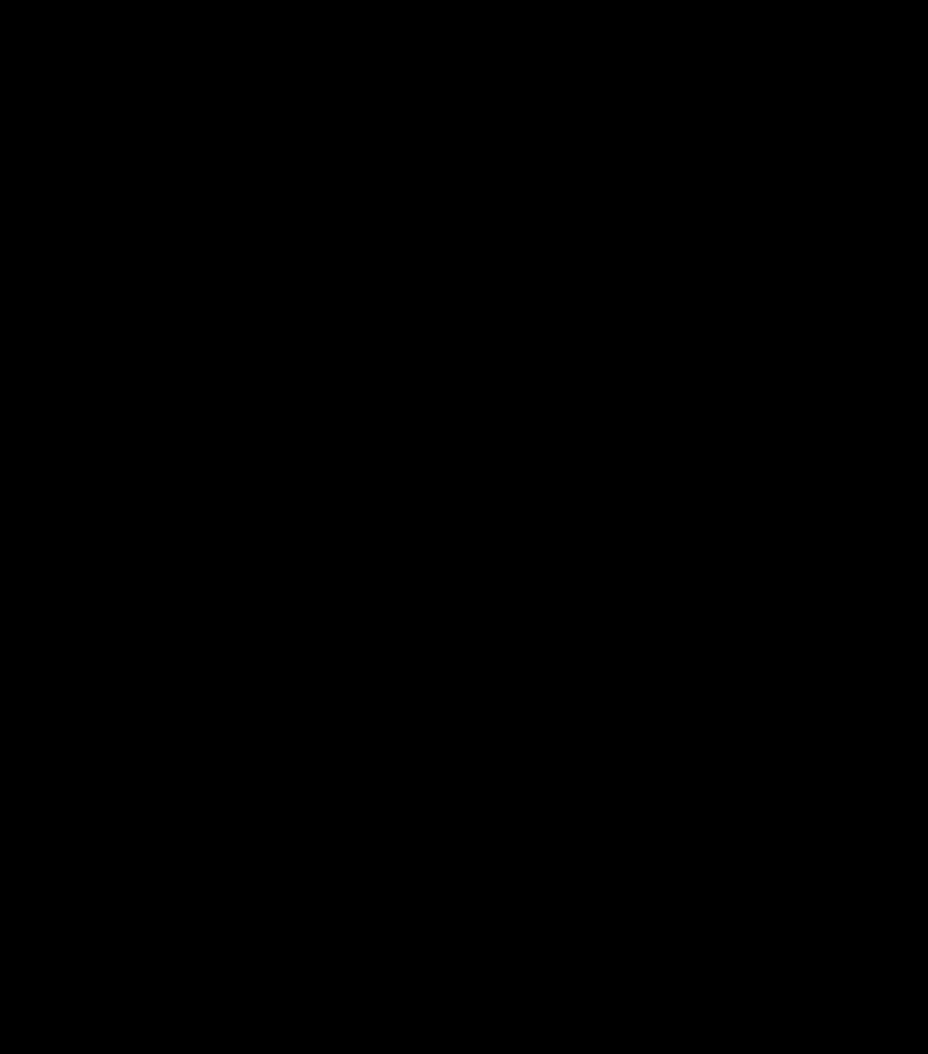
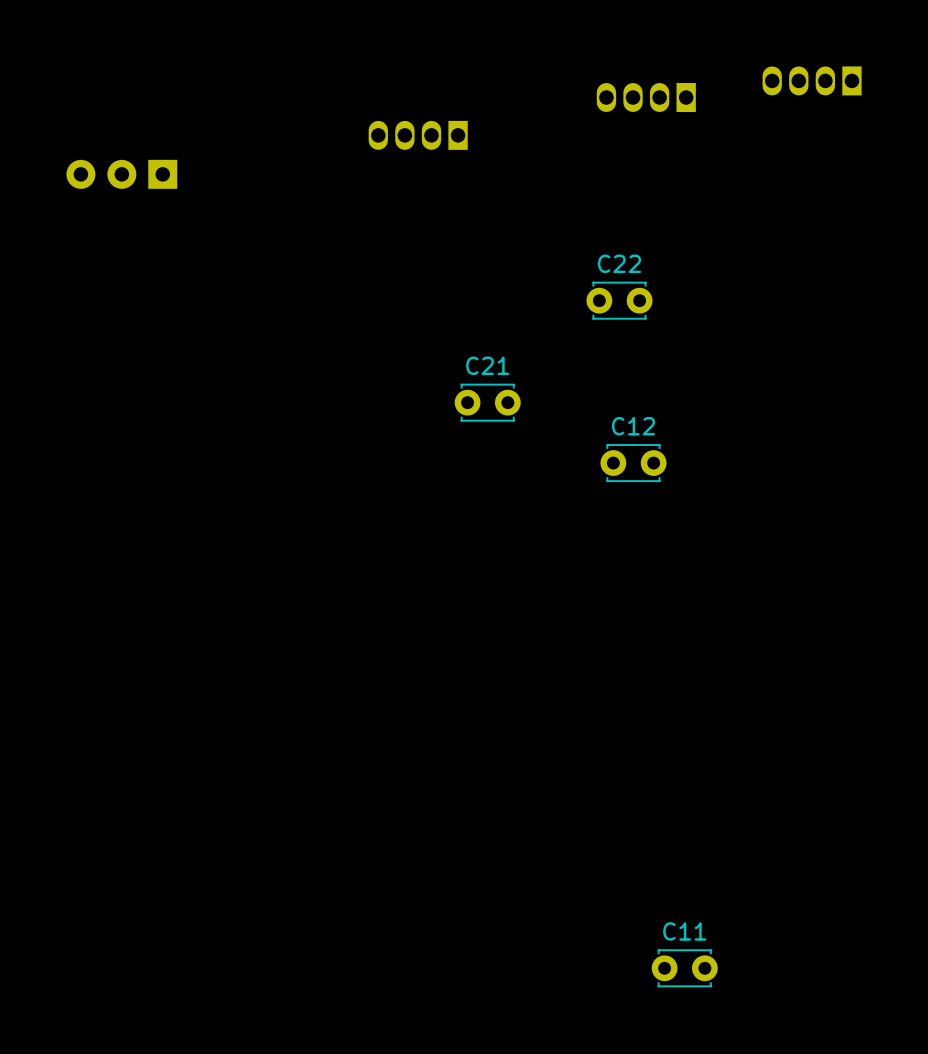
part: none -> (812, 80)
part: none -> (646, 97)
part: none -> (418, 135)
part: none -> (121, 174)
C22: none -> (619, 300)
C21: none -> (487, 402)
C12: none -> (633, 463)
C11: none -> (684, 968)

